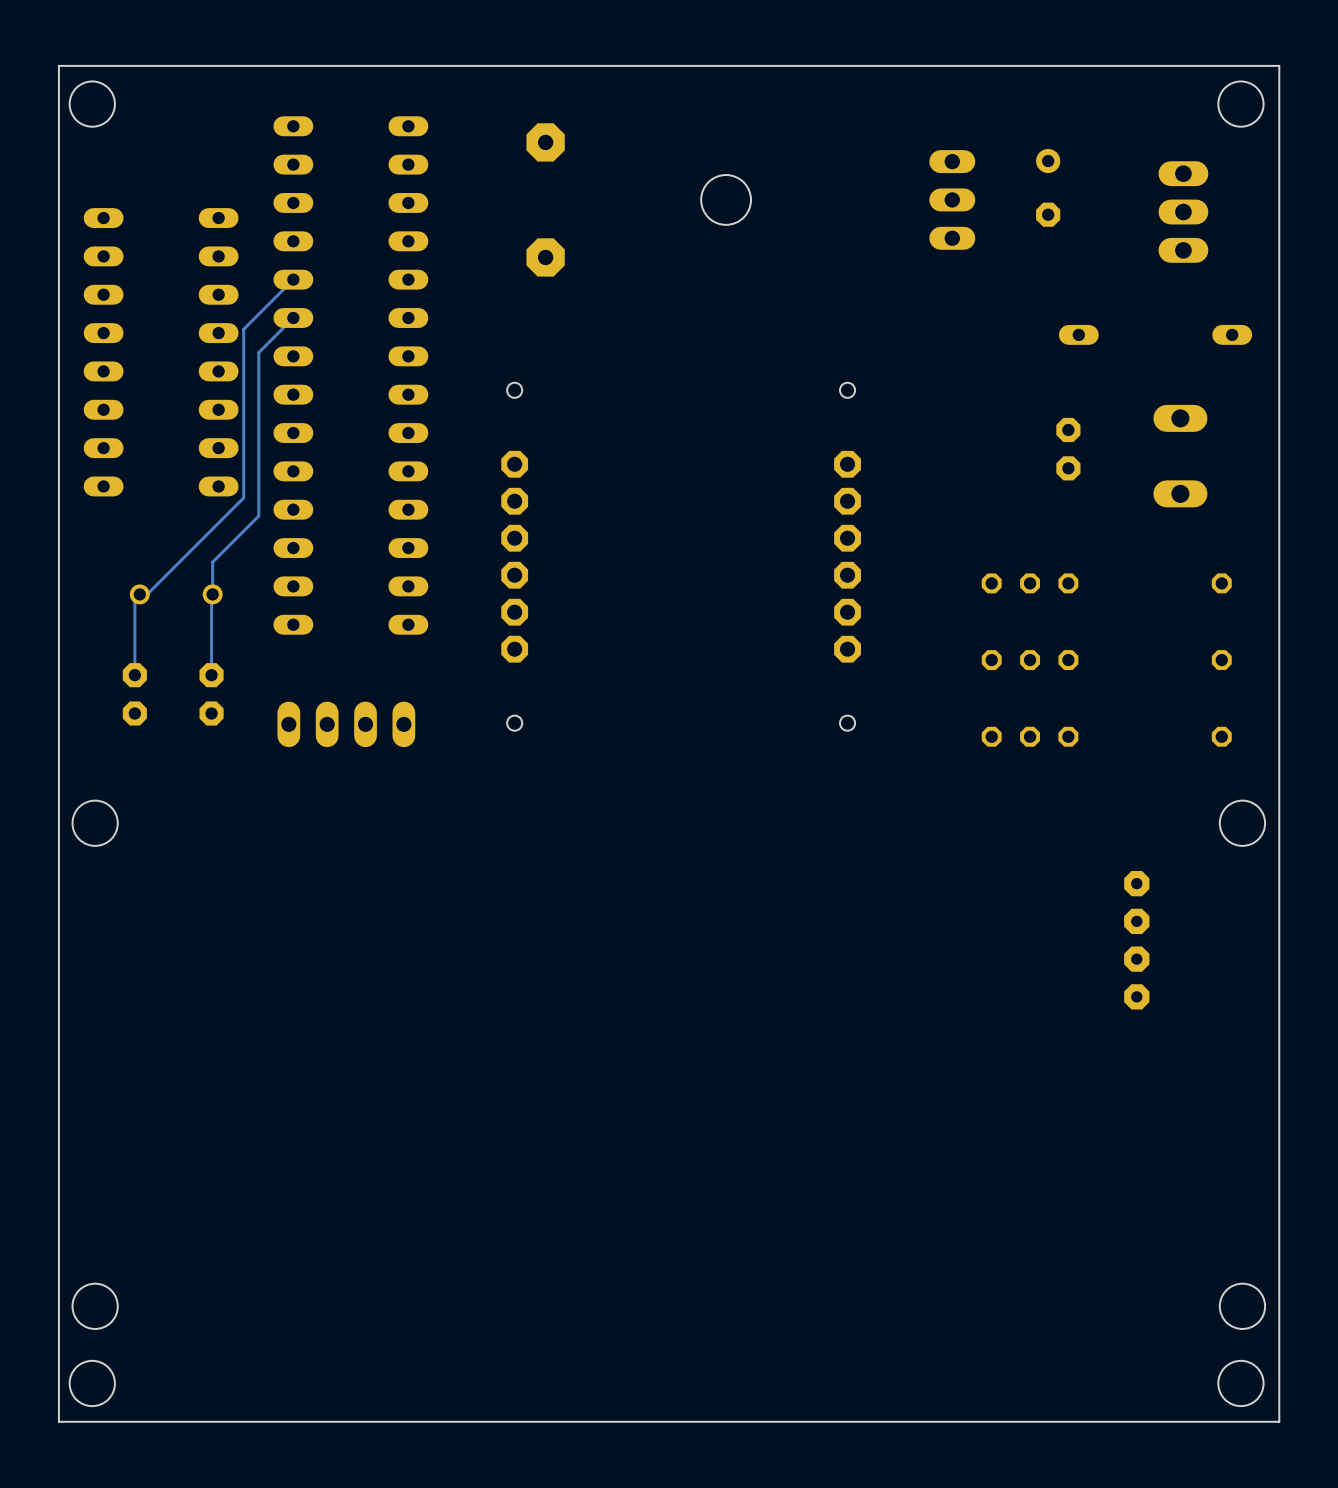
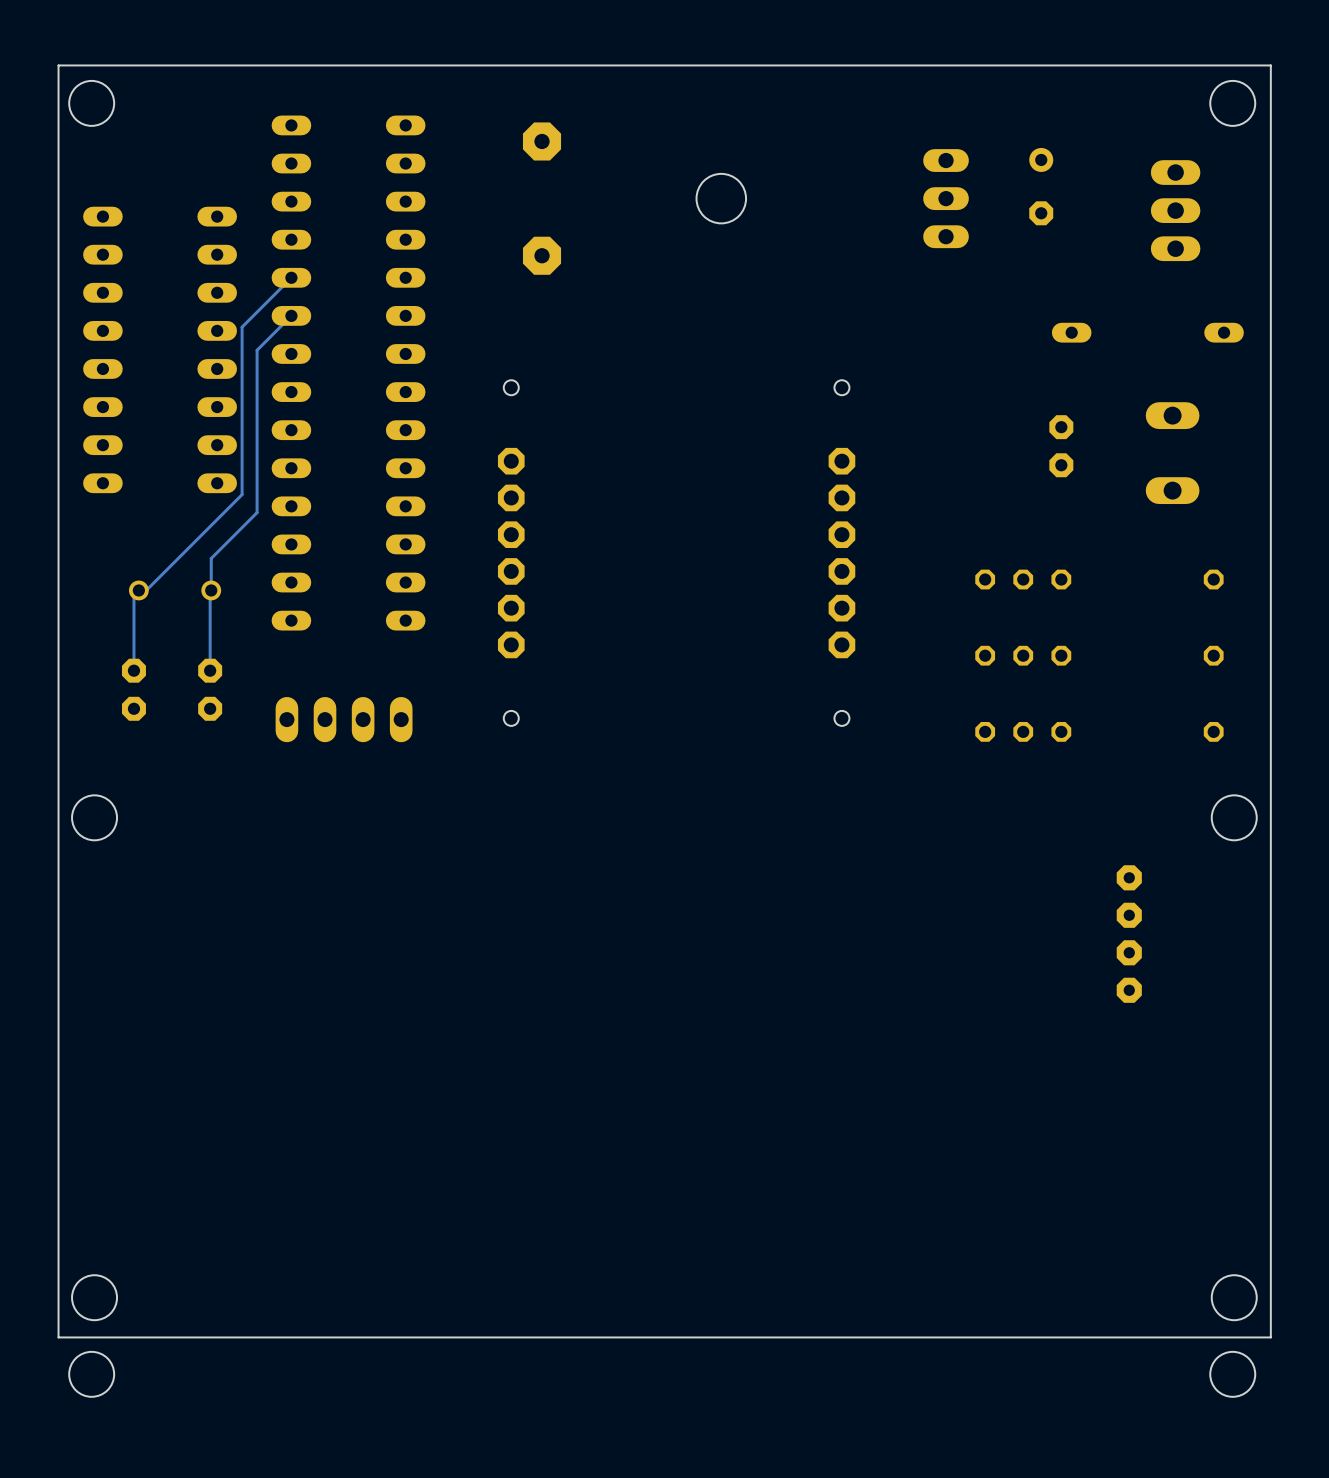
board edge: (1279, 1346) (1279, 1421) (58, 1421) (58, 1346) -> (1270, 1337) (58, 1337)

